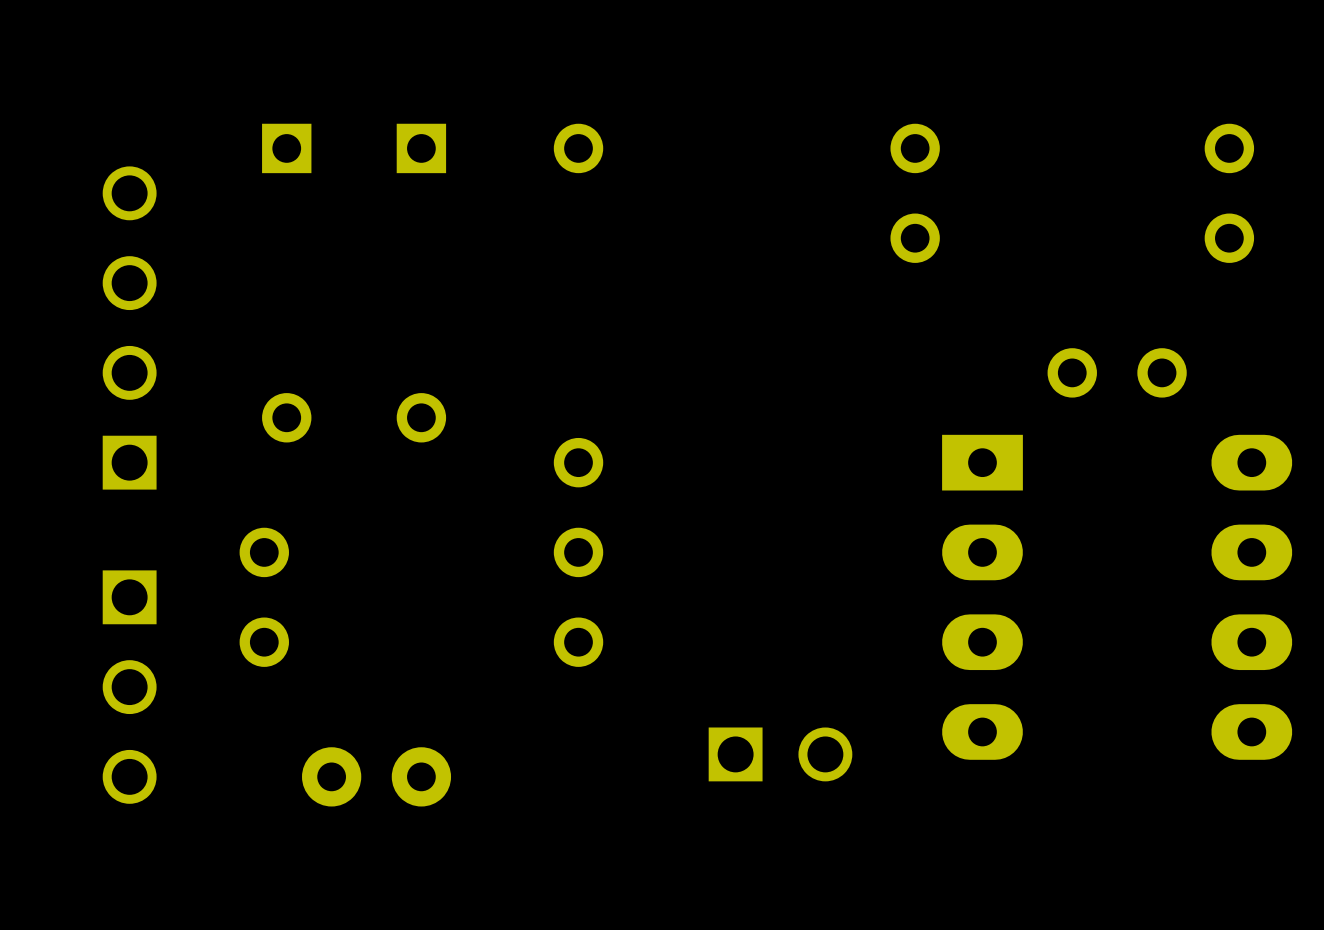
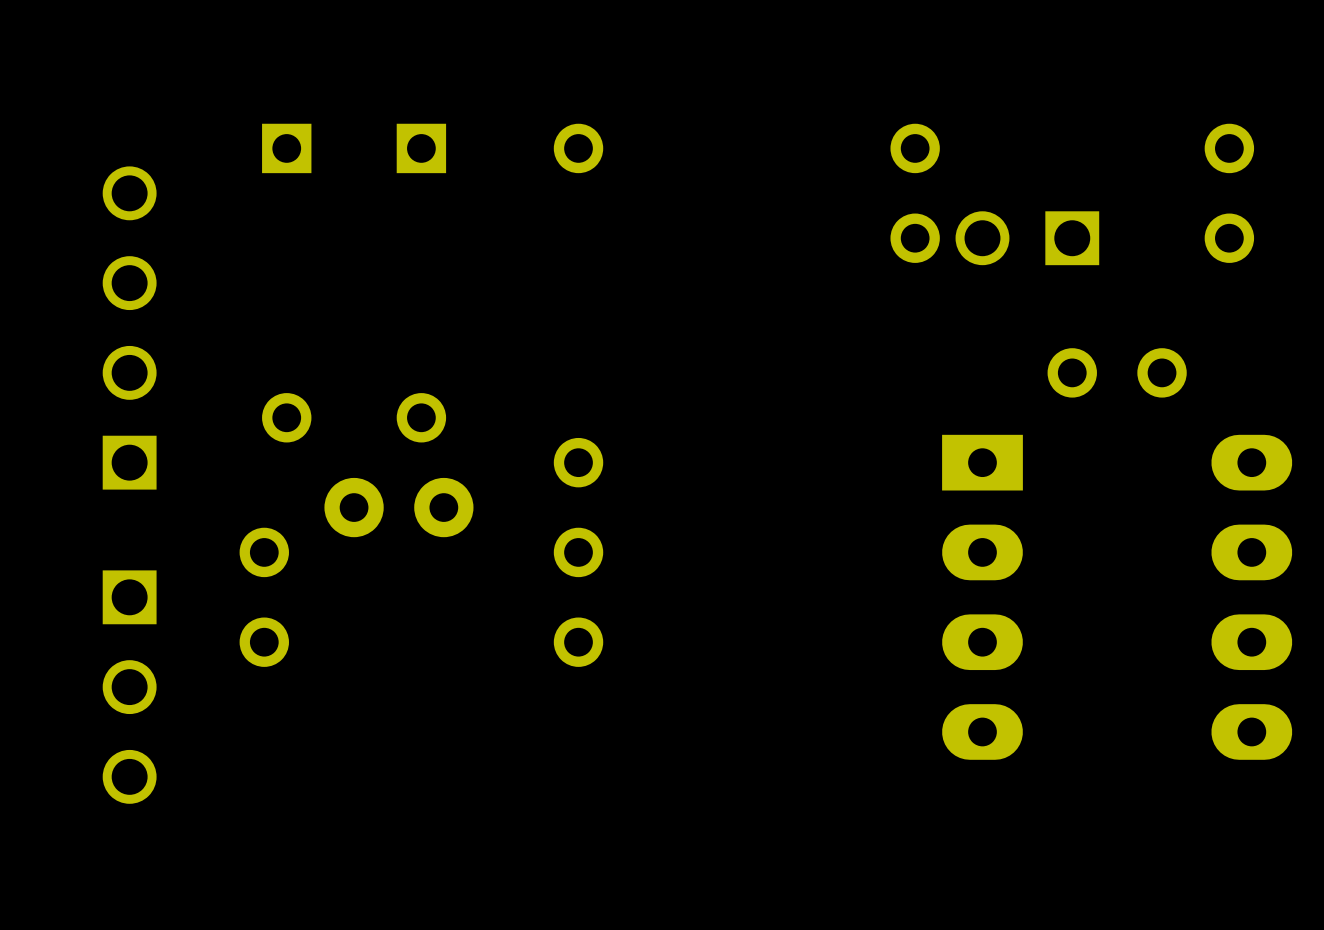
part rotation: 0° (780, 754) -> 180° (1027, 238)
part position: (780, 754) -> (1027, 238)
part position: (376, 776) -> (398, 507)

